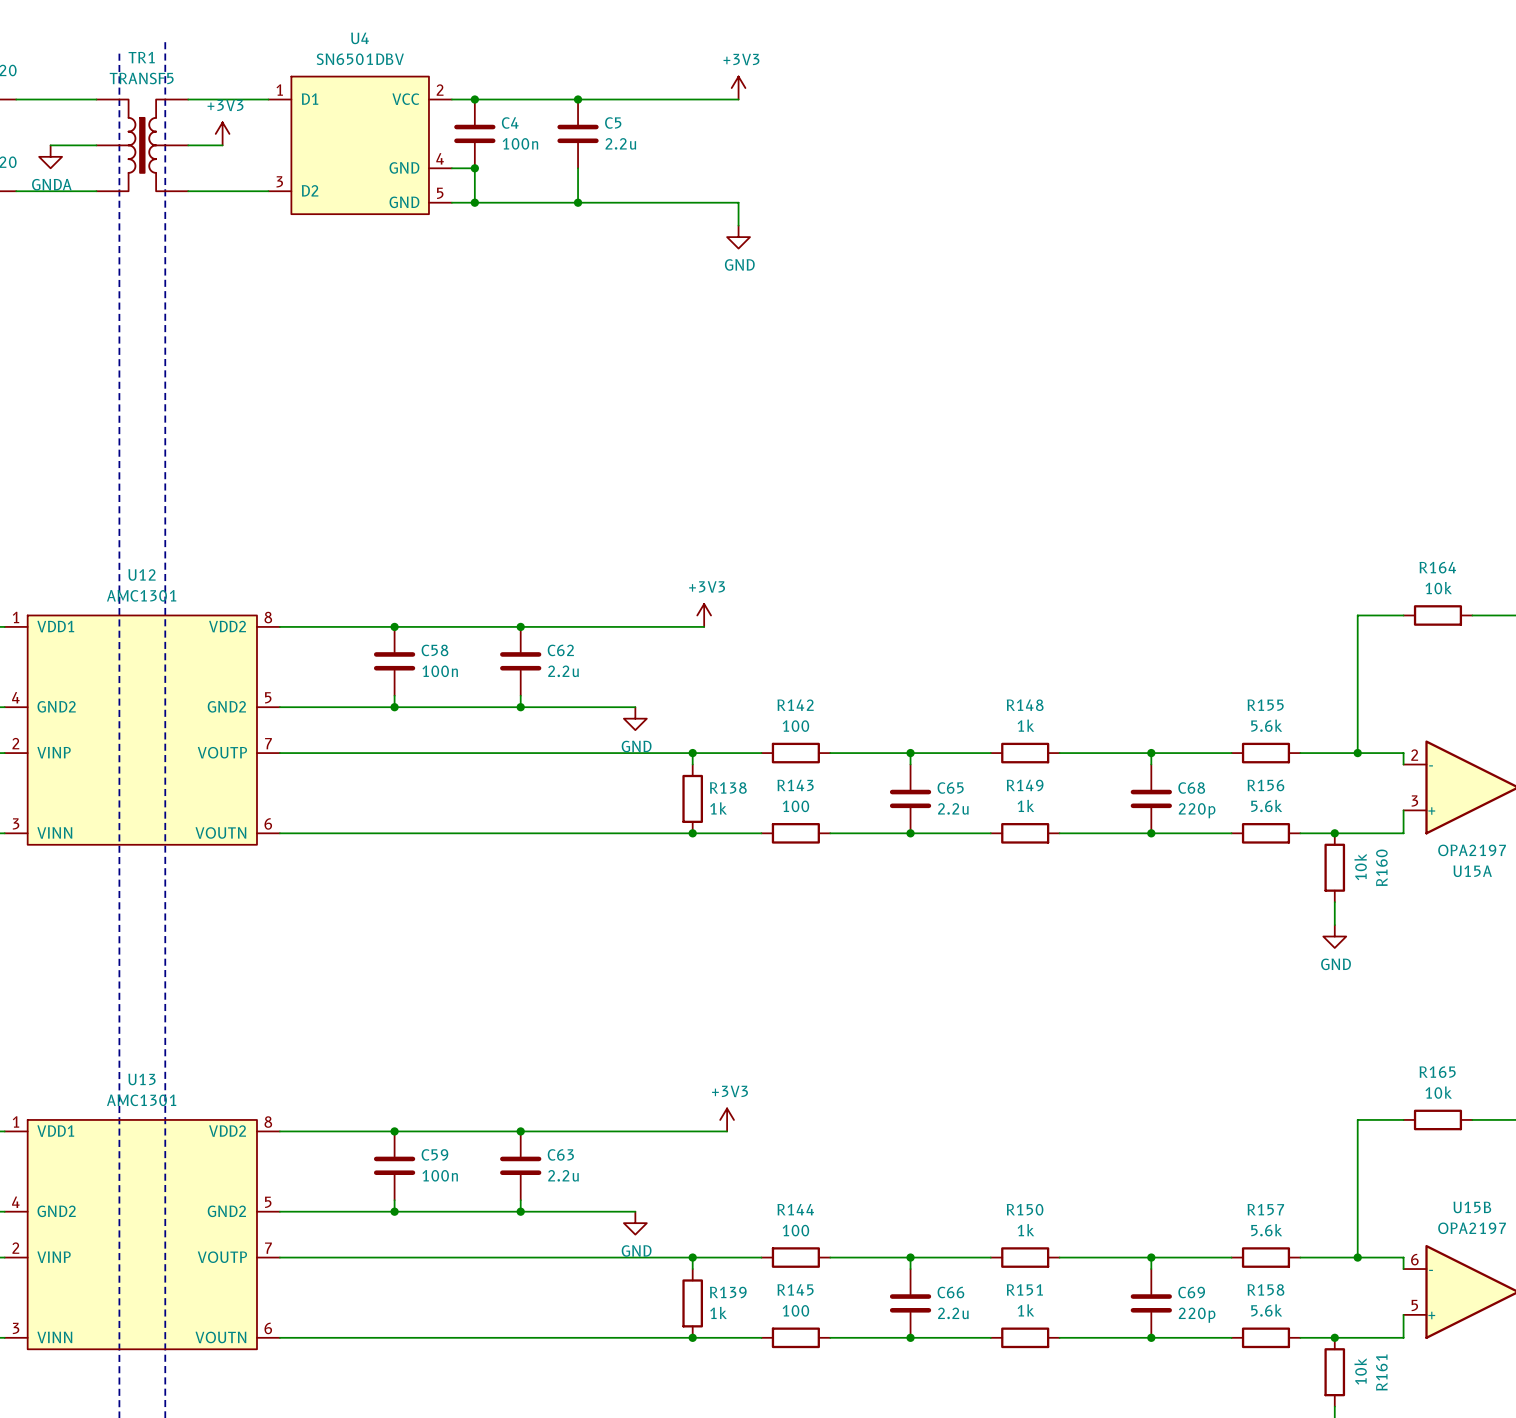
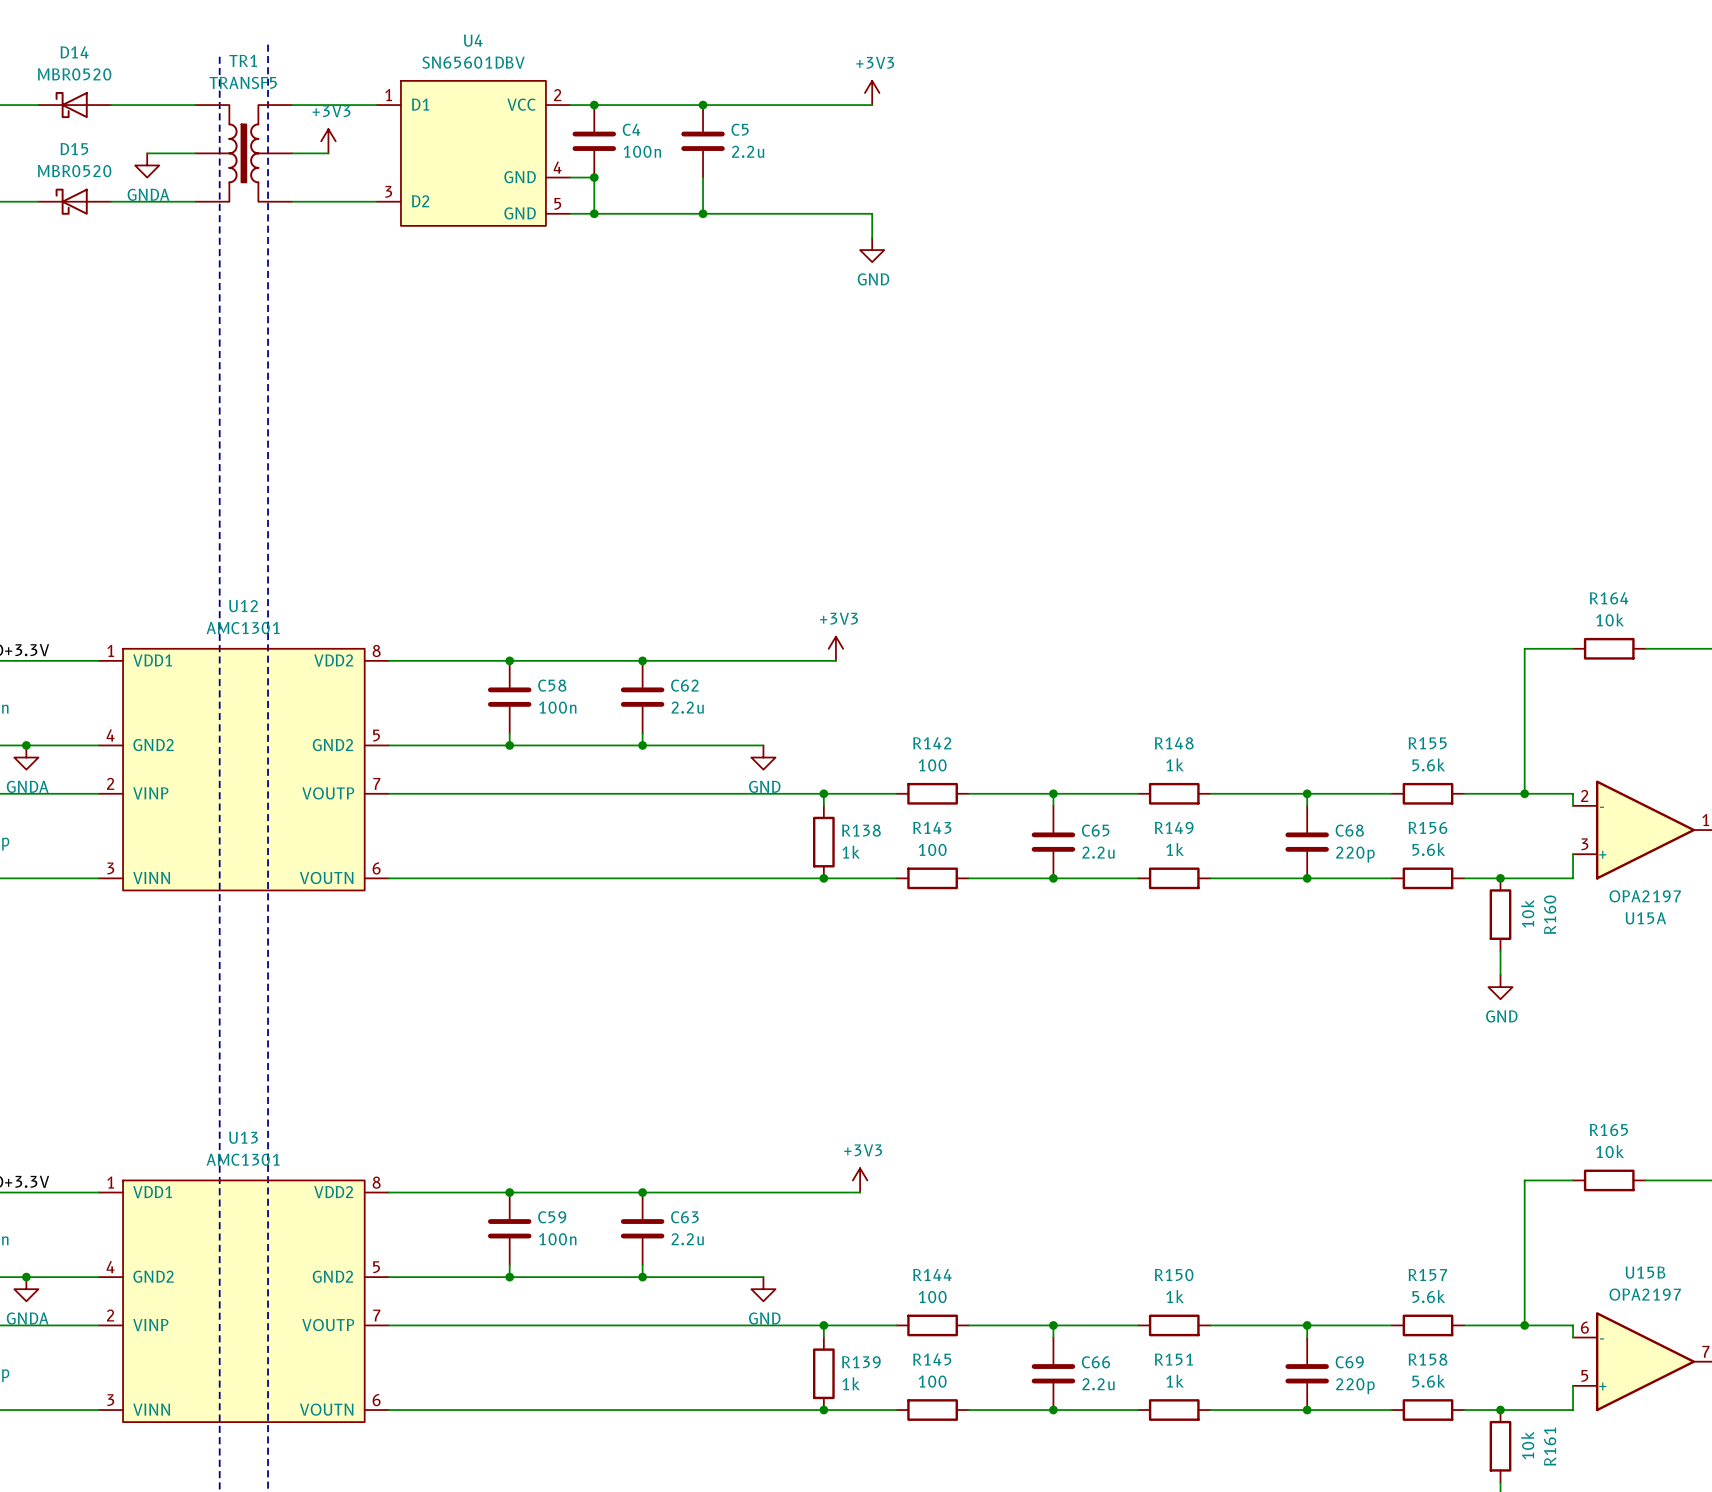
U4 value: SN6501DBV (360, 59) -> SN65601DBV (473, 62)

